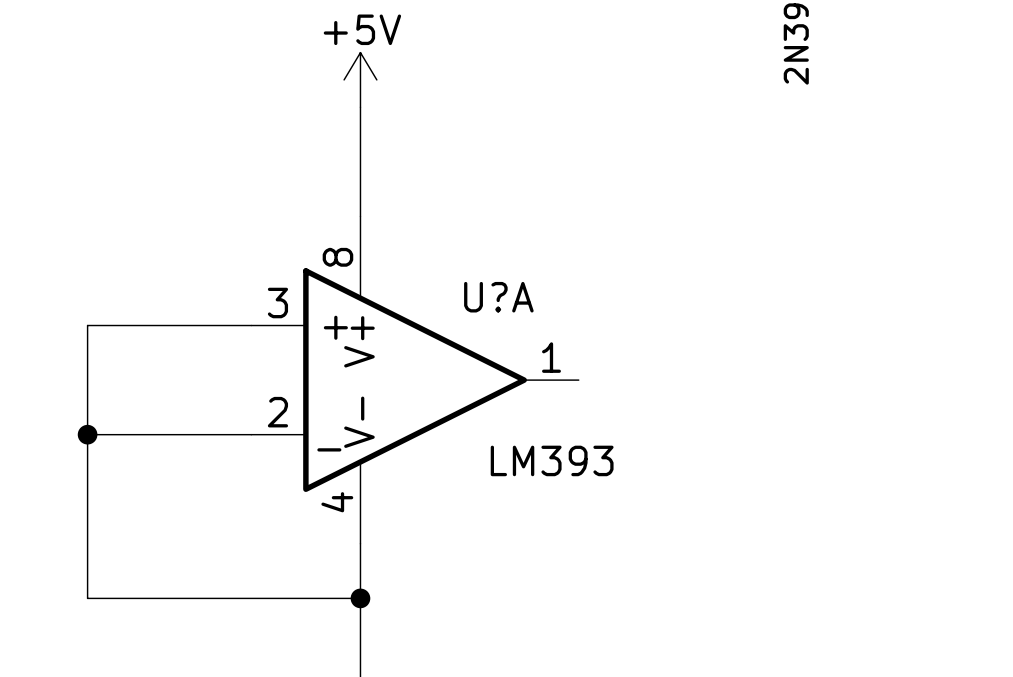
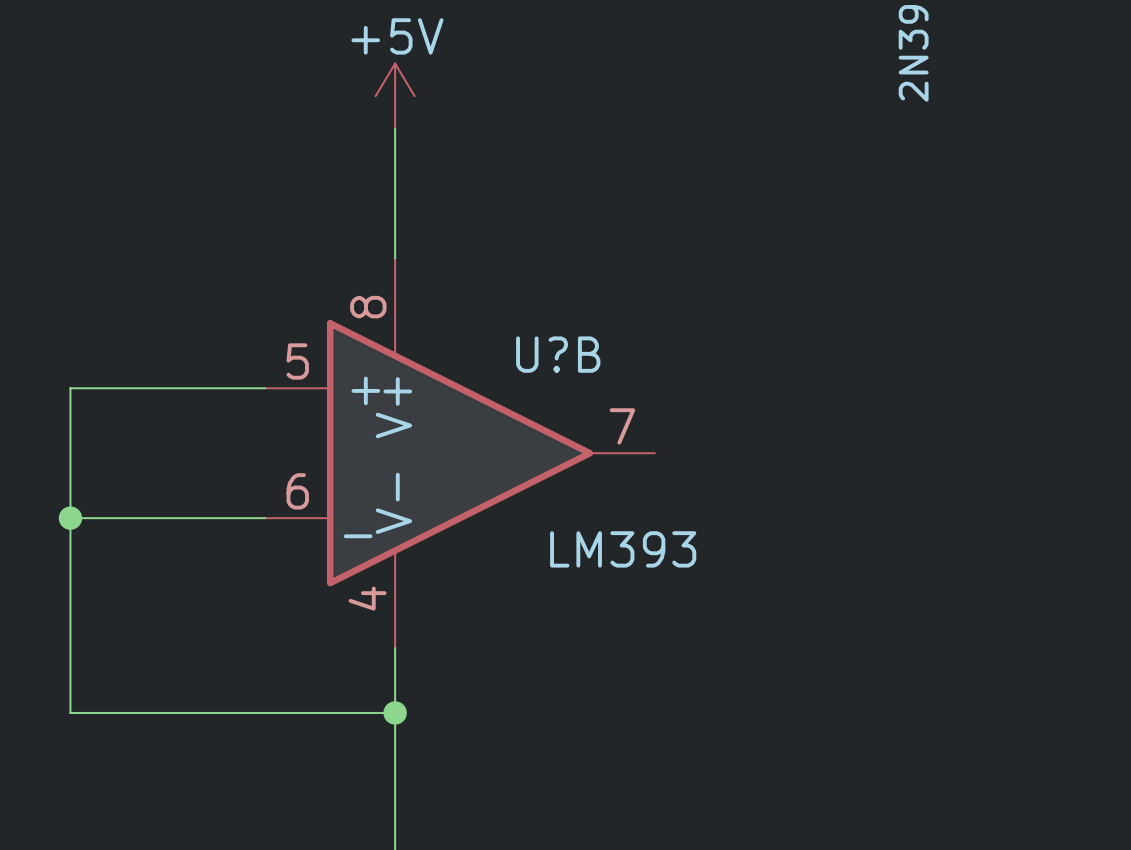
U?A name: U?A (498, 297) -> U?B (558, 354)
U?A pin number: 3 (277, 303) -> 5 (297, 361)
U?A pin number: 1 (551, 357) -> 7 (622, 426)
U?A pin number: 2 (277, 412) -> 6 (297, 491)

